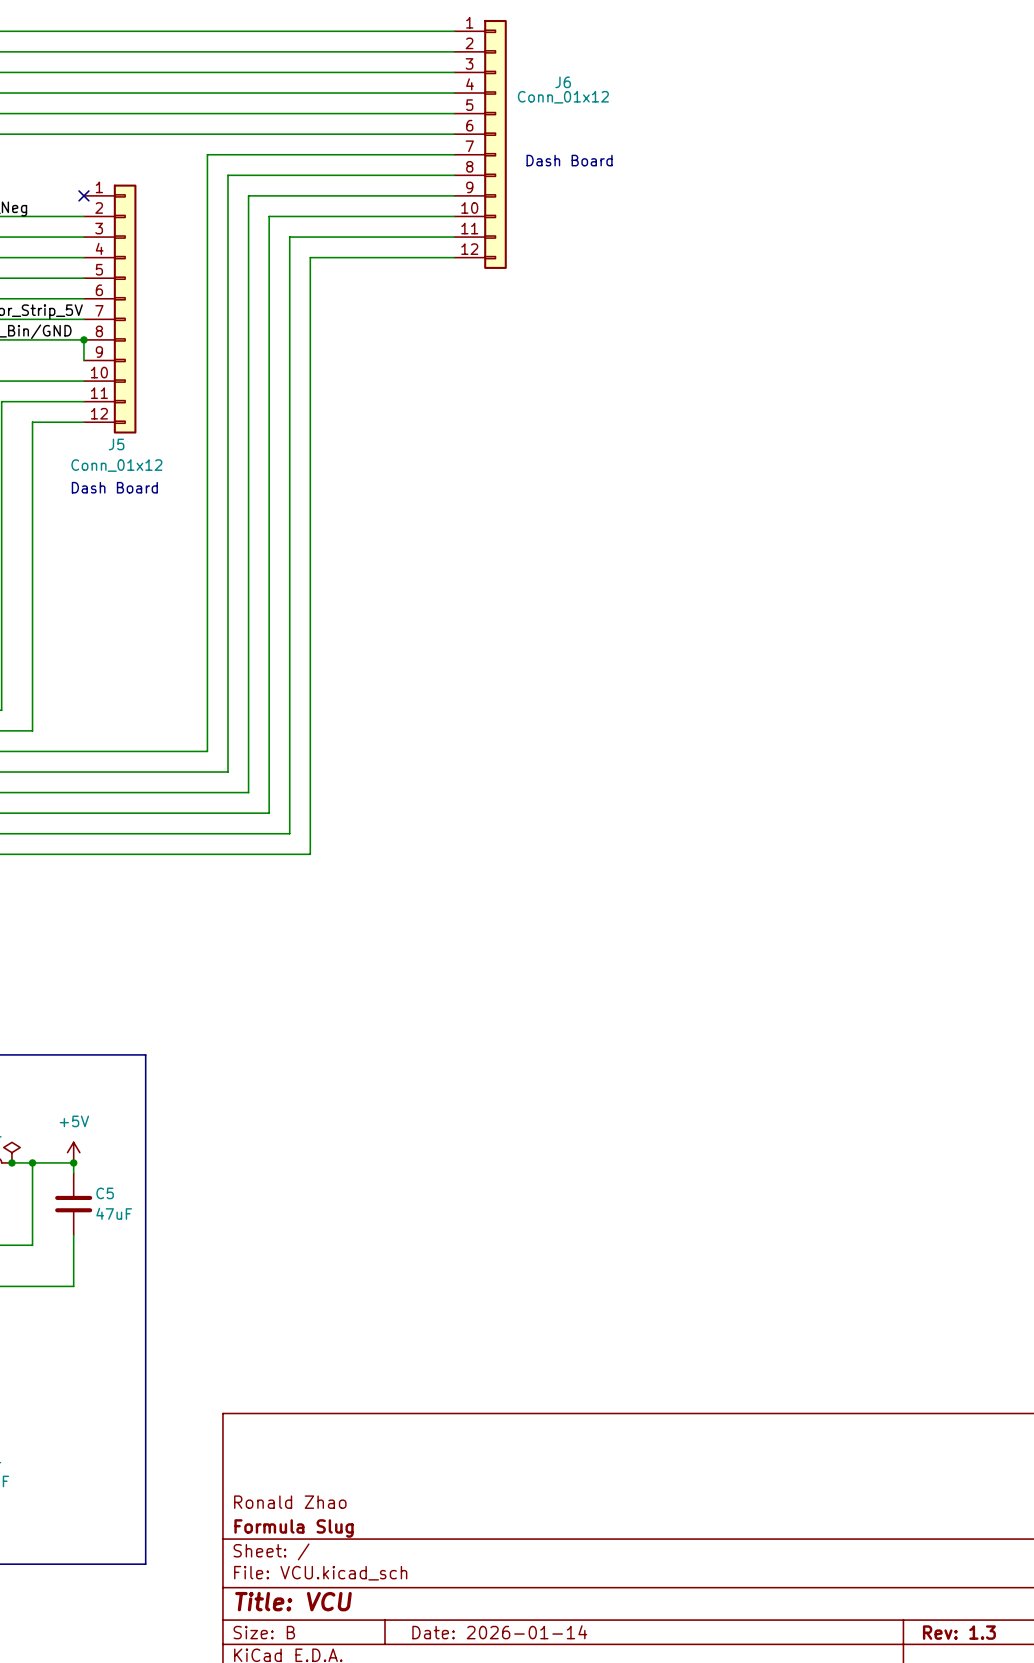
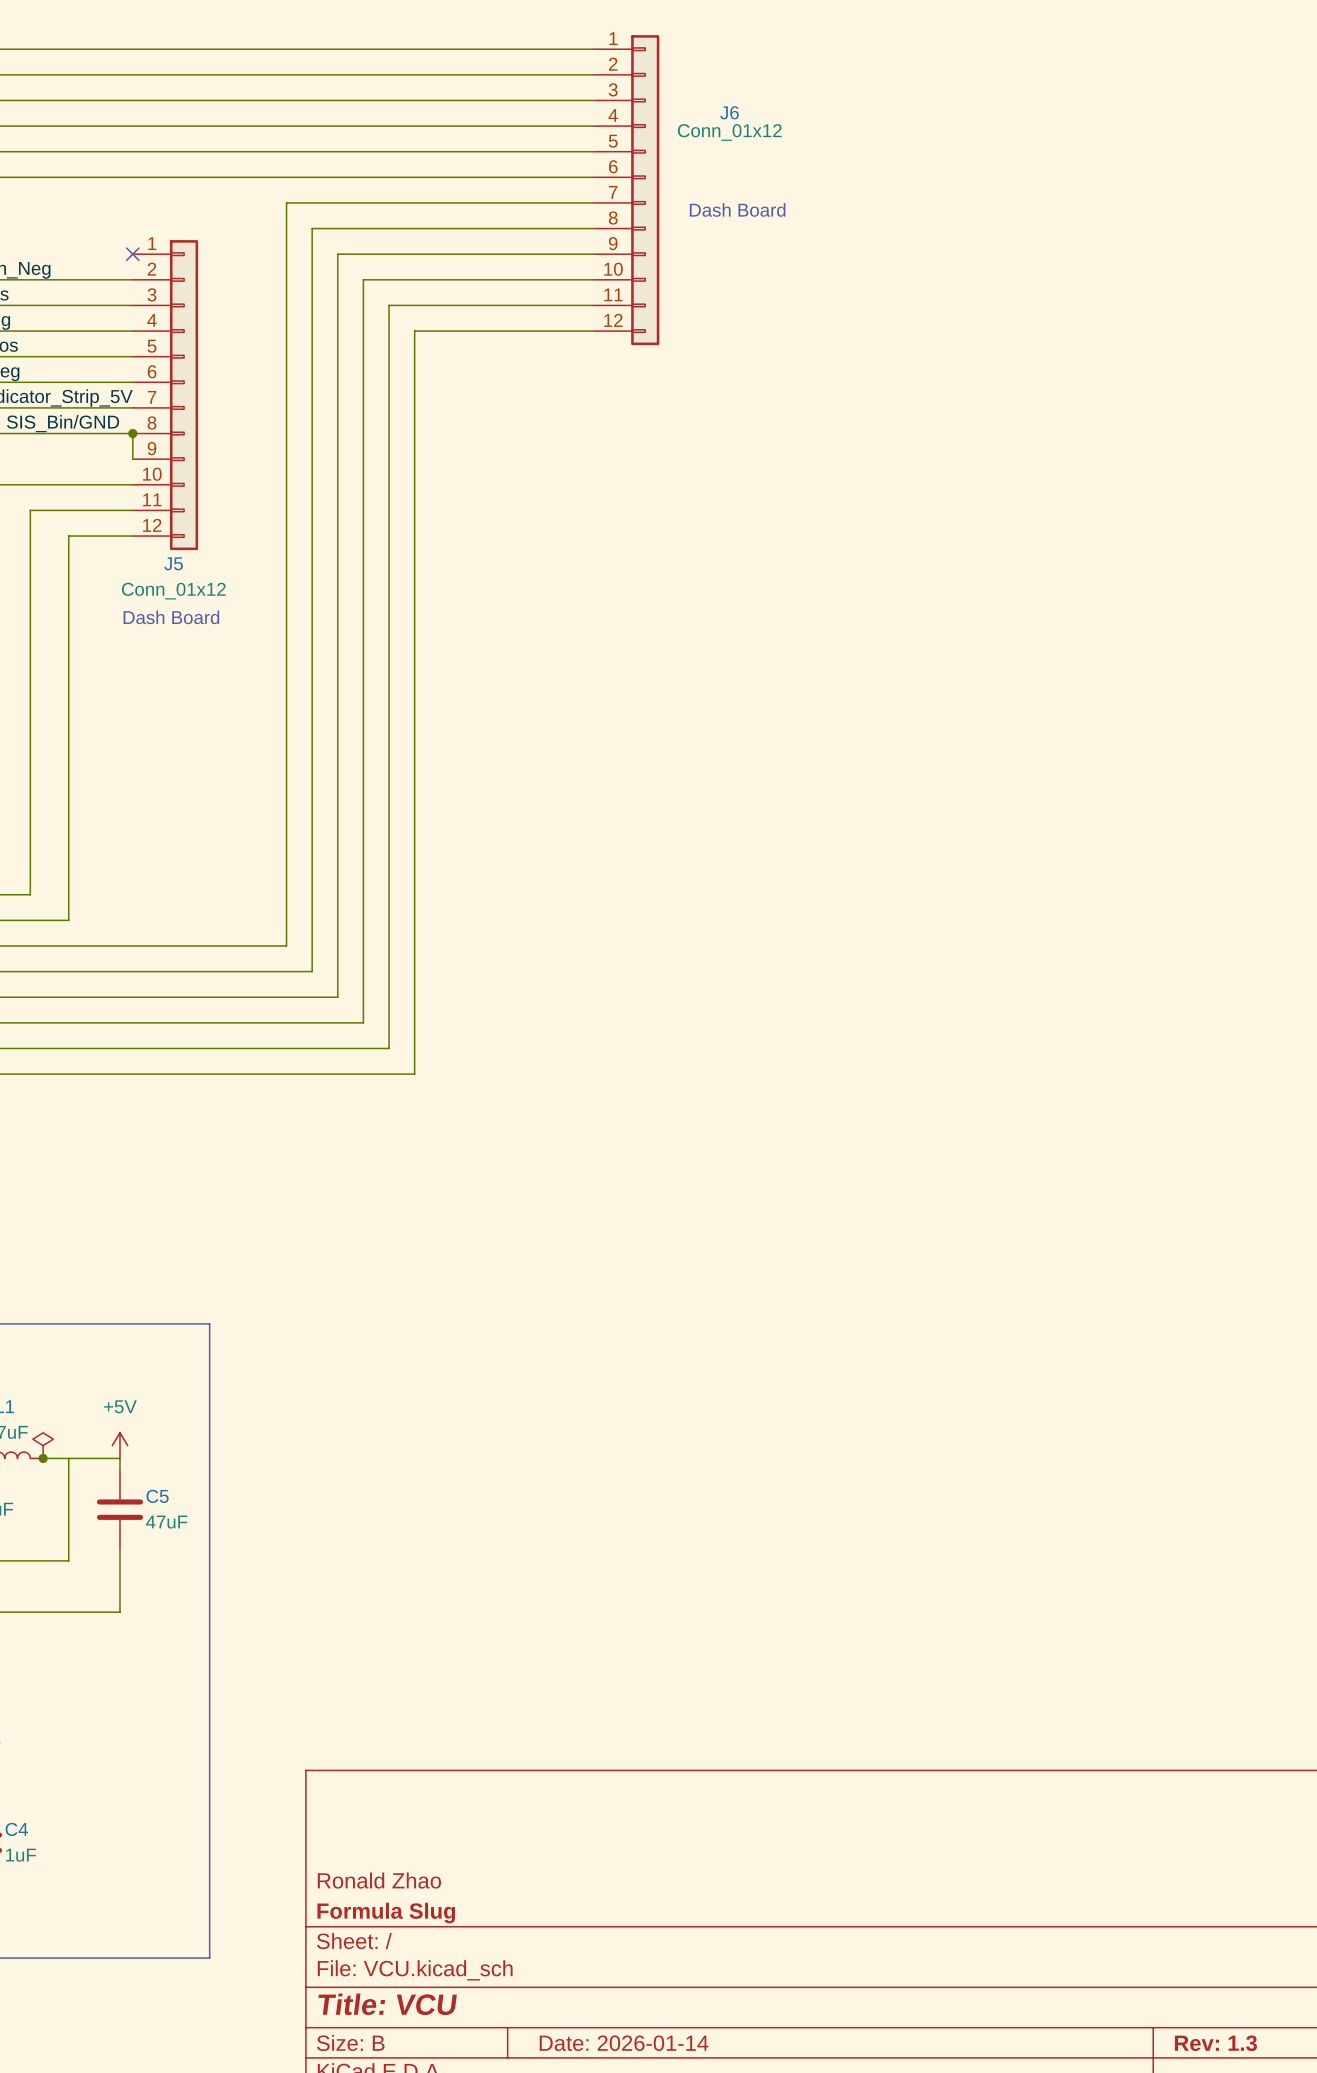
junction: (32, 1162) -> none
junction: (73, 1162) -> none

